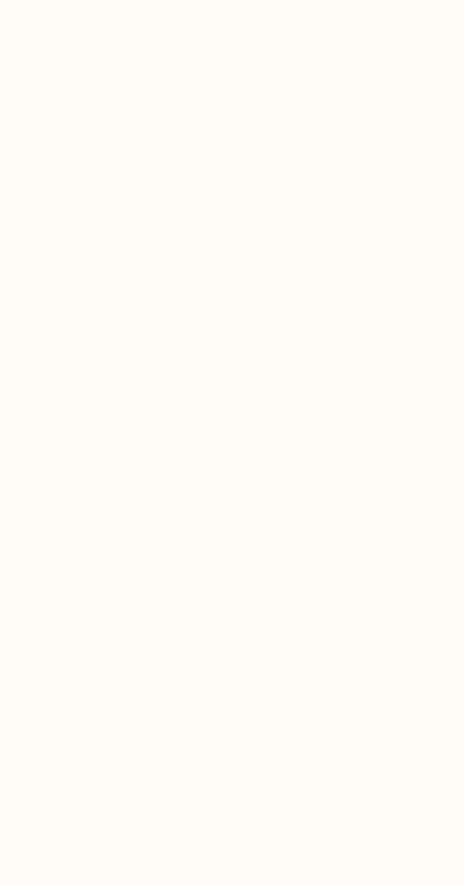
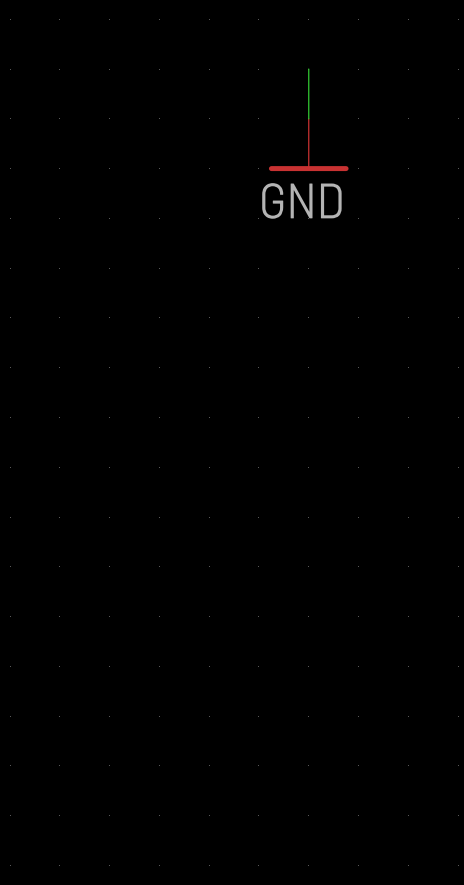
wire: none -> (308, 69) (308, 118)
power symbol: none -> GND (308, 144)

